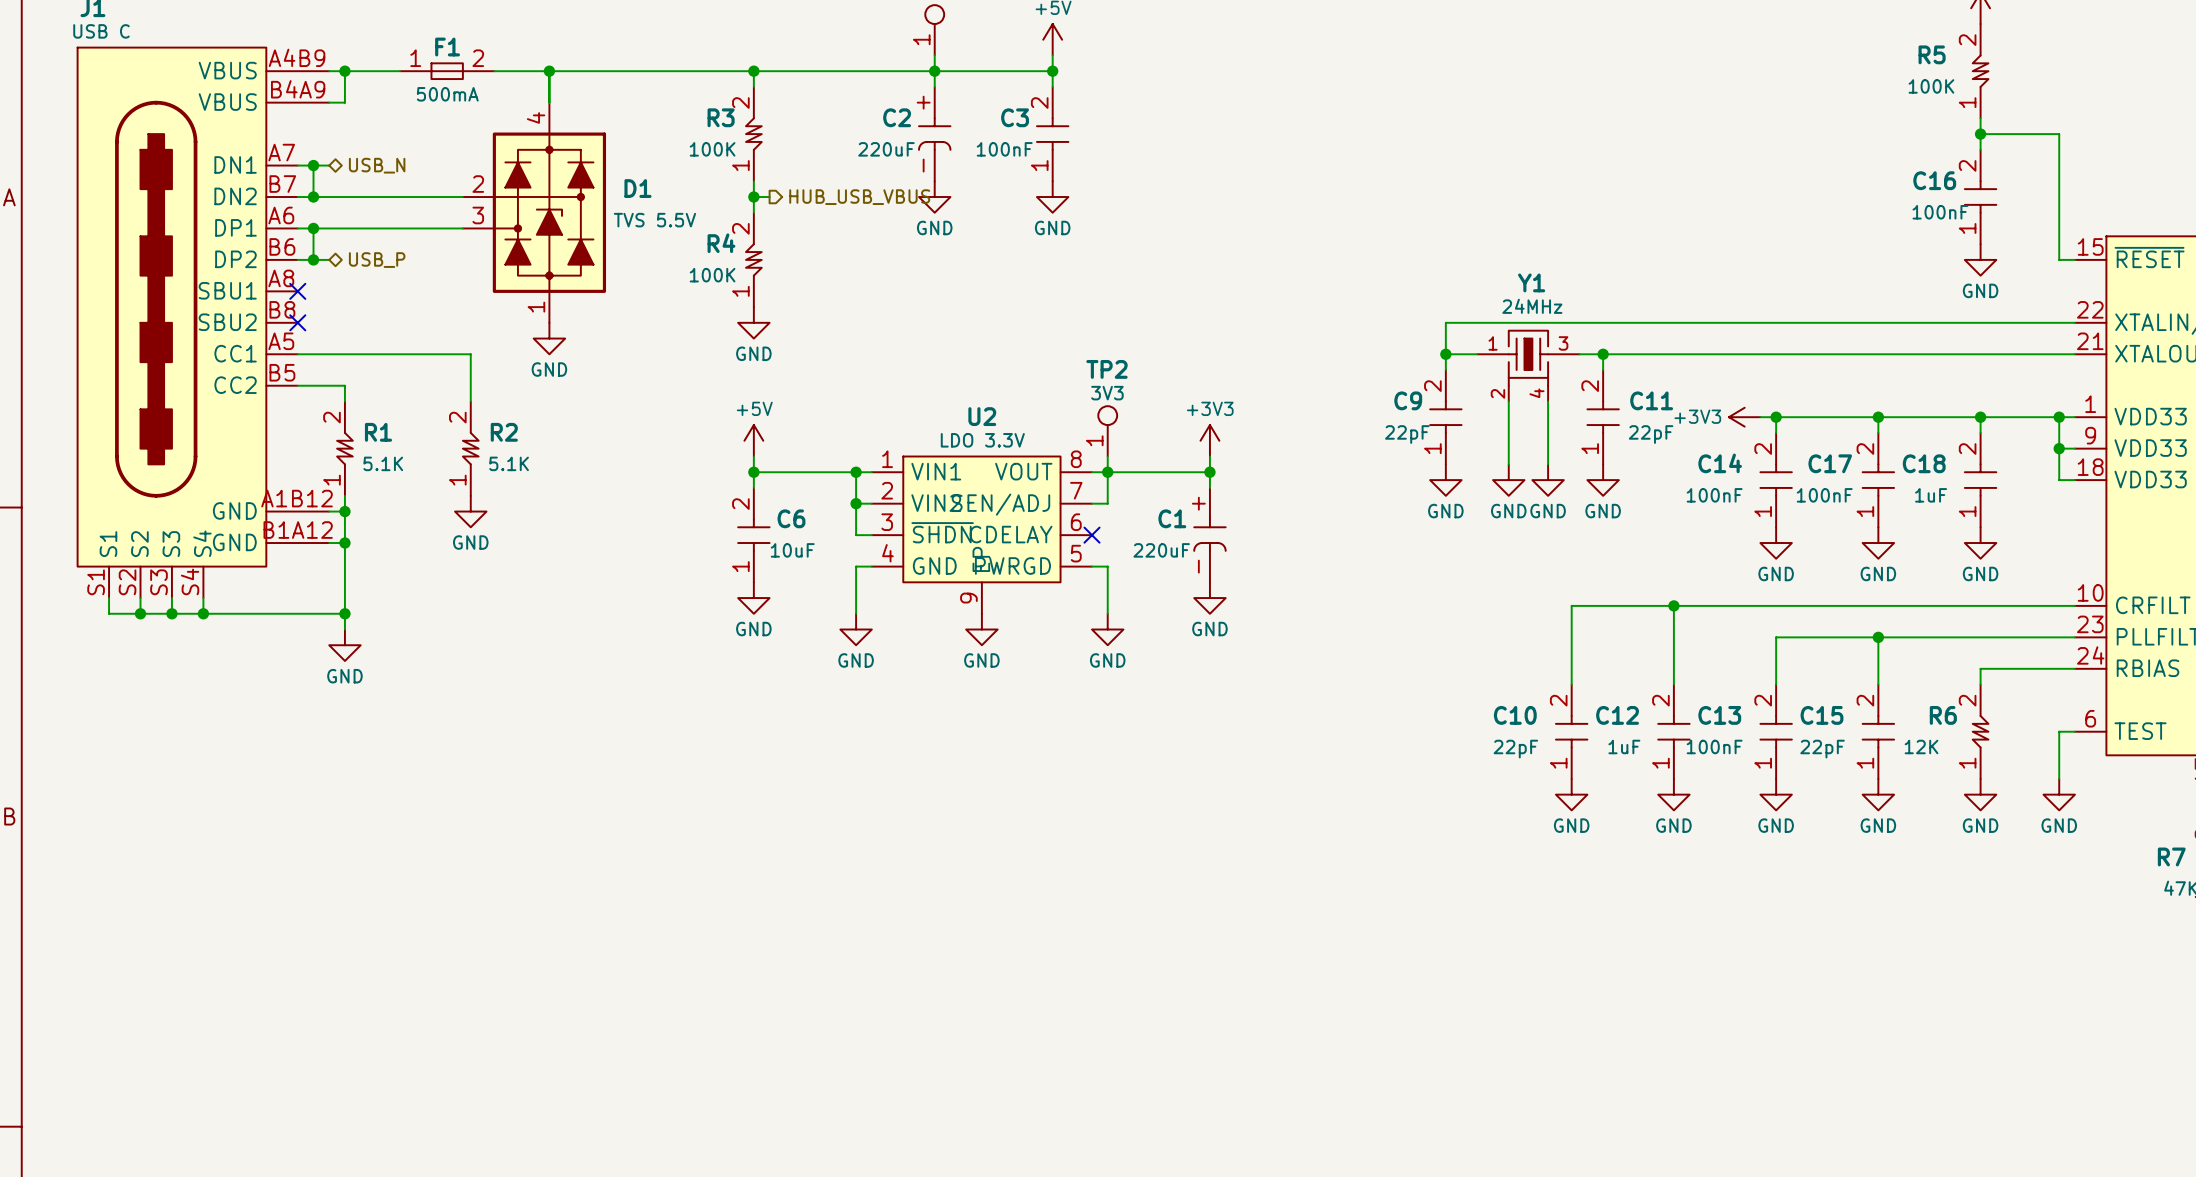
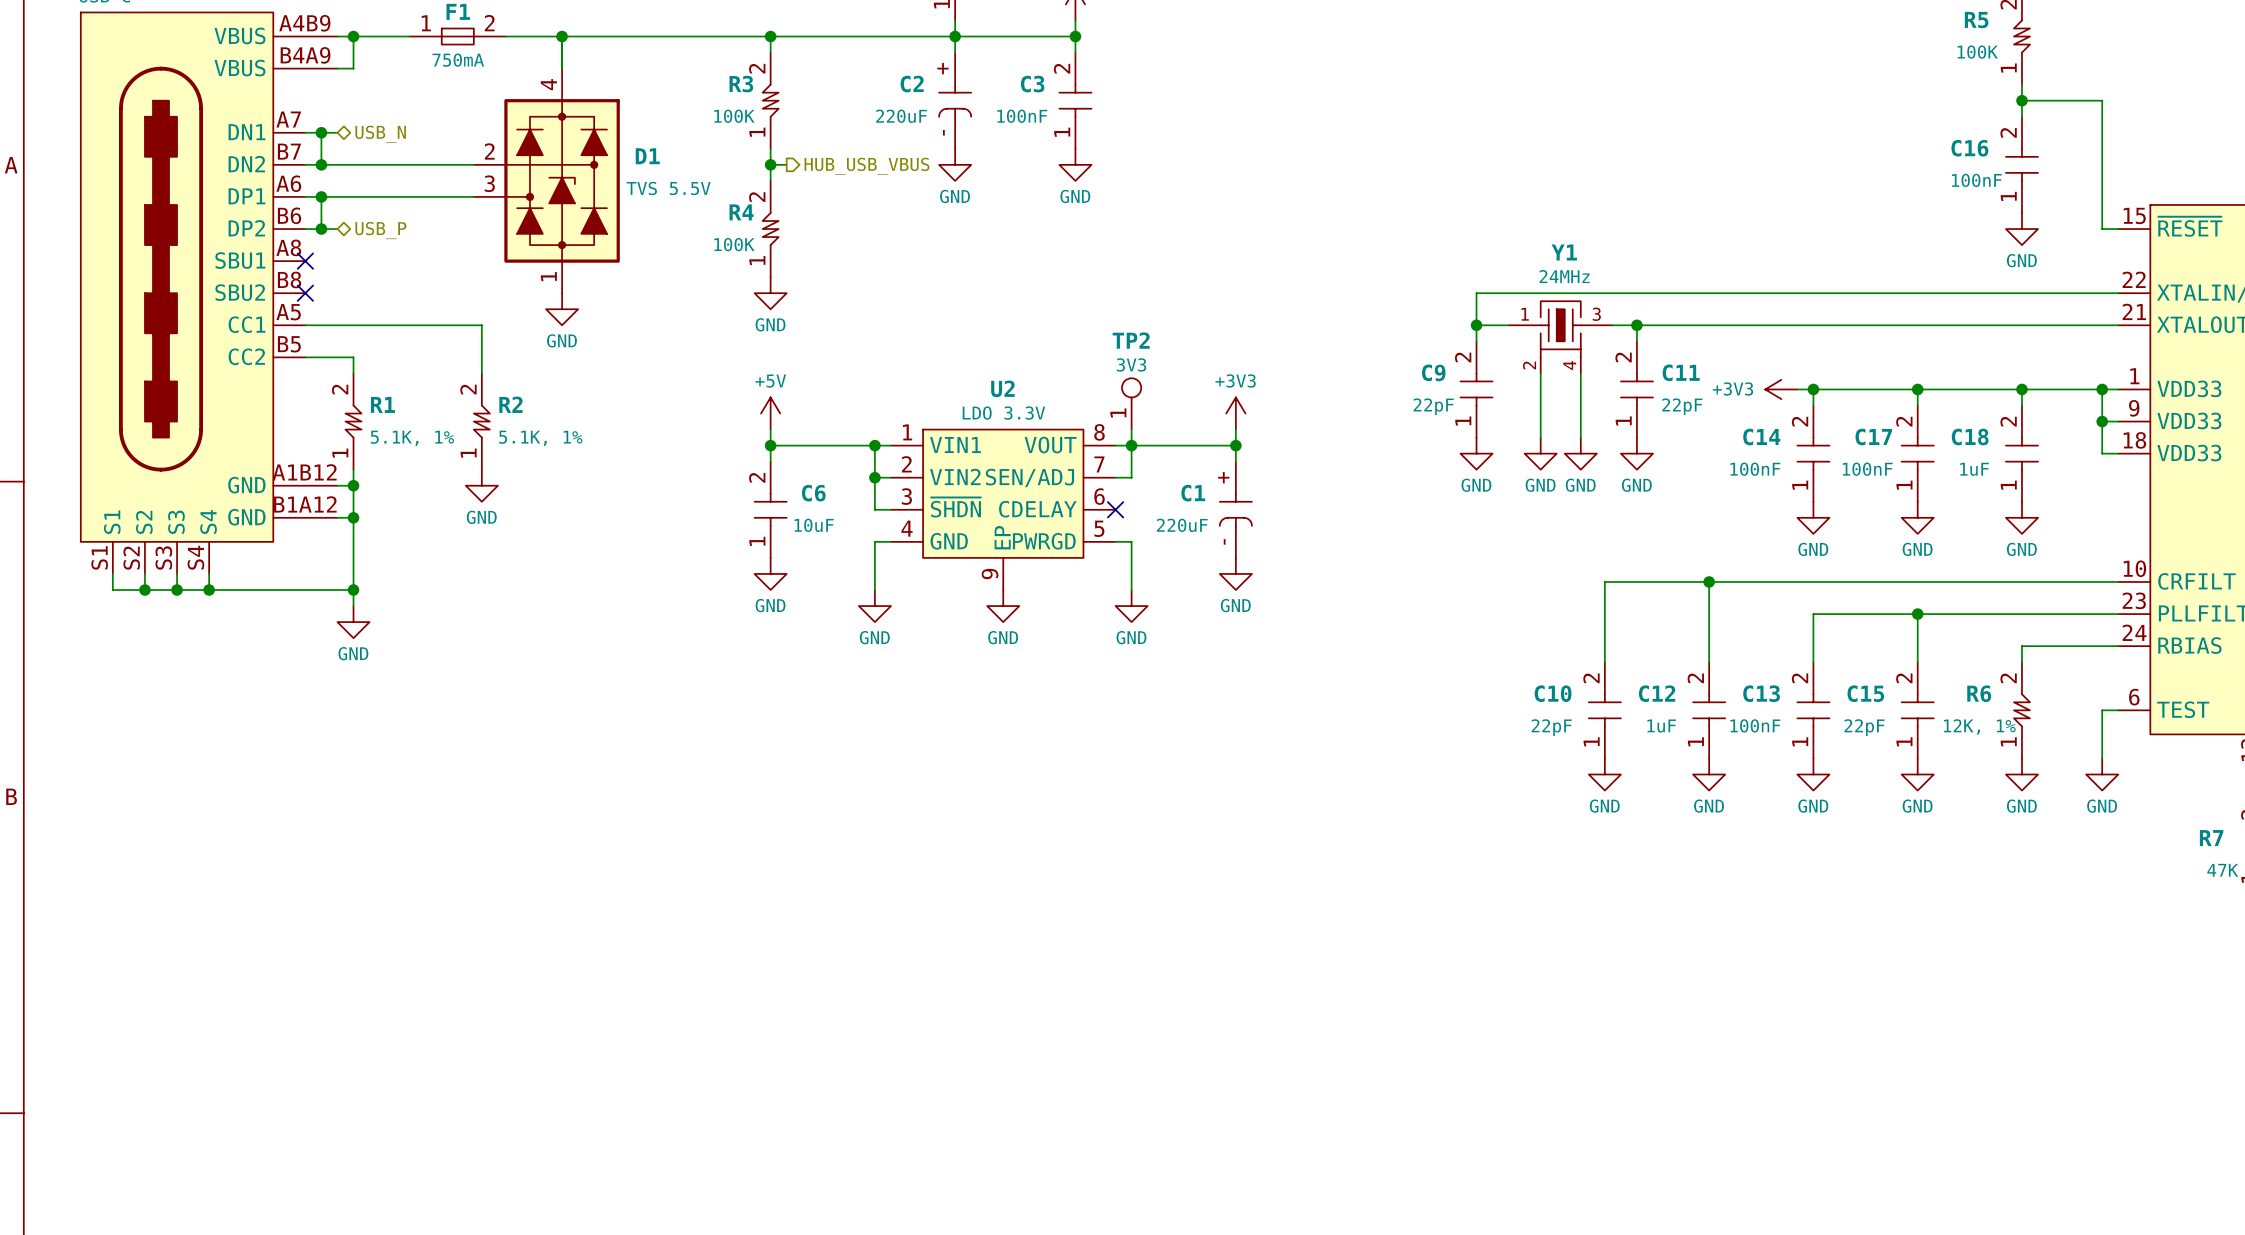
F1 value: 500mA (447, 94) -> 750mA (458, 60)
R1 value: 5.1K (383, 463) -> 5.1K, 1% (412, 438)
R2 value: 5.1K (509, 463) -> 5.1K, 1% (540, 438)
R6 value: 12K (1921, 746) -> 12K, 1% (1979, 727)

